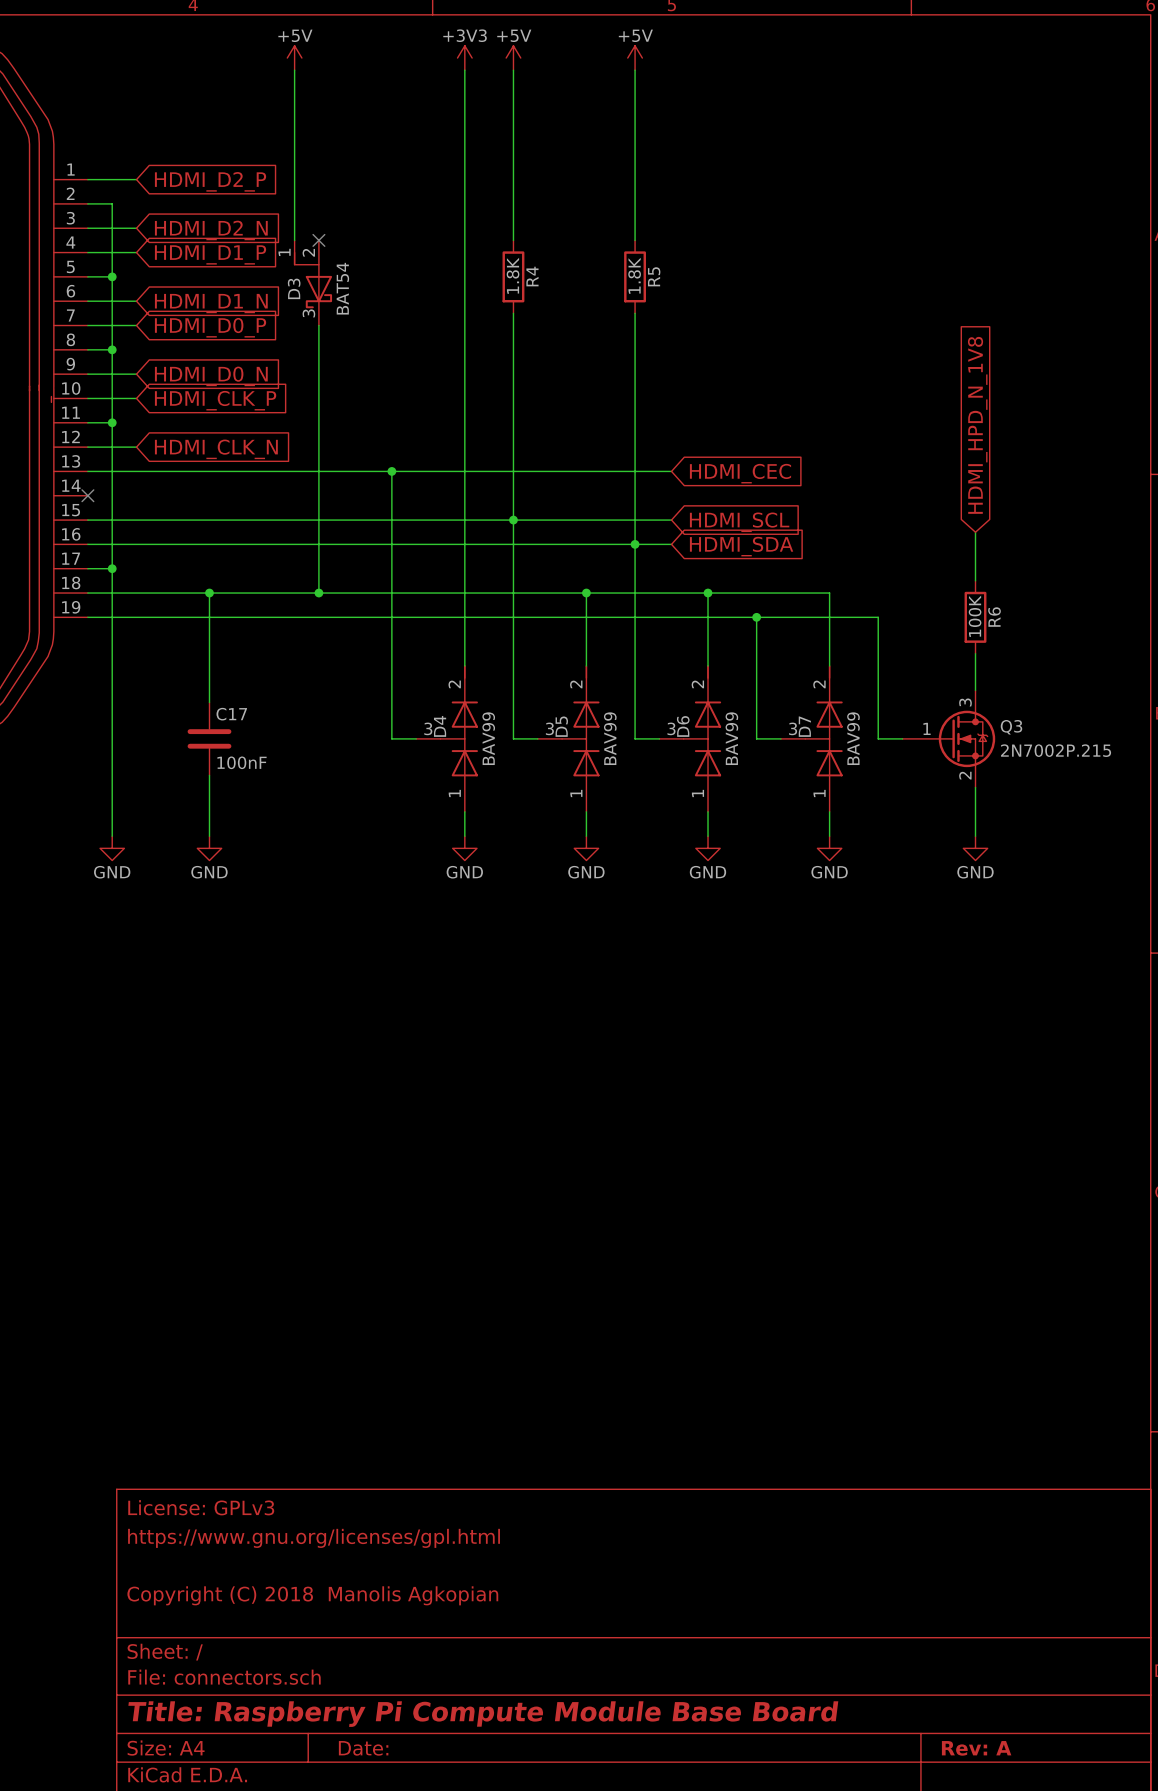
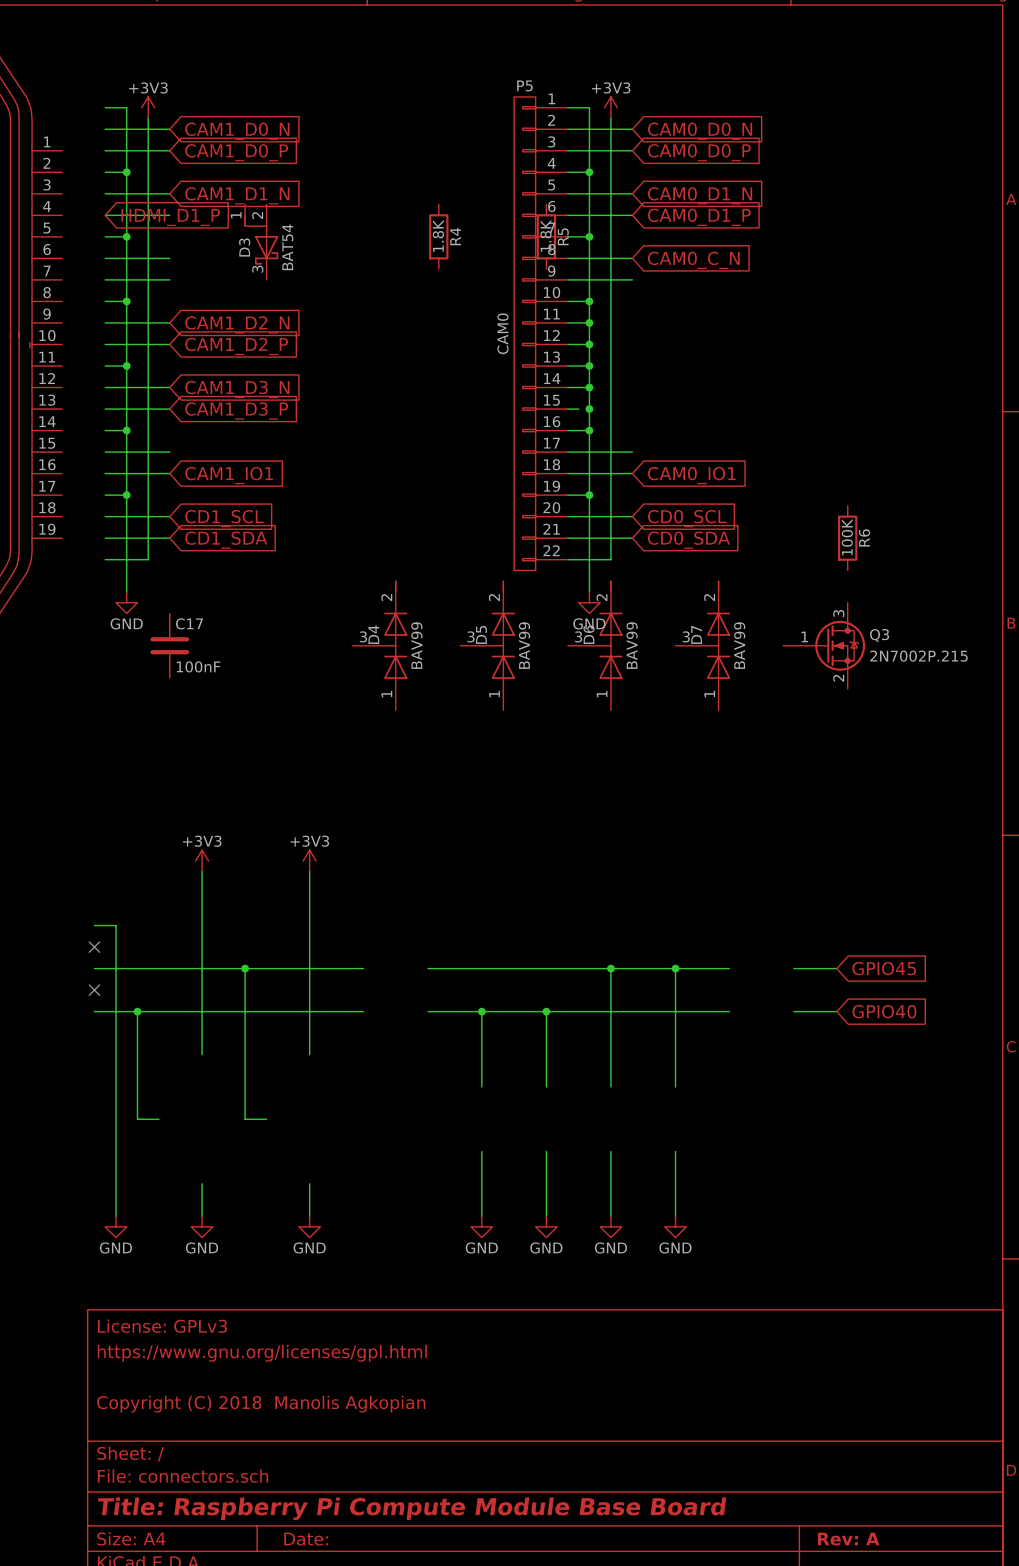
power symbol: +5V (294, 58) -> none
power symbol: +3V3 (464, 58) -> none
power symbol: +5V (513, 58) -> none
power symbol: +5V (635, 58) -> none
wire: (294, 70) (294, 240) -> none
wire: (464, 70) (464, 665) -> none
wire: (513, 70) (513, 240) -> none
wire: (635, 70) (635, 240) -> none
wire: none -> (105, 107) (126, 107) (126, 591)
power symbol: none -> +3V3 (148, 107)
wire: none -> (567, 107) (589, 107) (589, 591)
power symbol: none -> +3V3 (610, 107)
wire: none -> (148, 118) (148, 559) (105, 559)
wire: none -> (610, 118) (610, 516)
wire: none -> (105, 129) (169, 129)
wire: none -> (567, 129) (632, 129)
global label: none -> CAM1_D0_N (237, 131)
global label: none -> CAM0_D0_N (700, 131)
wire: (87, 179) (136, 179) -> (169, 150) (105, 150)
wire: none -> (567, 150) (632, 150)
global label: HDMI_D2_P (210, 181) -> none
global label: none -> CAM1_D0_P (236, 152)
global label: none -> CAM0_D0_P (699, 152)
wire: (87, 203) (112, 203) (112, 836) -> none
wire: none -> (105, 172) (126, 172)
junction: none -> (126, 172)
wire: none -> (567, 172) (589, 172)
junction: none -> (589, 172)
wire: (87, 228) (136, 228) -> (169, 193) (105, 193)
wire: none -> (567, 193) (632, 193)
global label: HDMI_D2_N (211, 230) -> none
global label: none -> CAM1_D1_N (237, 195)
global label: none -> CAM0_D1_N (700, 195)
no-connect mark: (318, 240) -> none
wire: (87, 252) (136, 252) -> (169, 215) (105, 215)
wire: none -> (567, 215) (632, 215)
global label: none -> CAM0_D1_P (699, 217)
wire: (87, 276) (112, 276) -> (105, 236) (126, 236)
junction: (112, 276) -> none
junction: none -> (126, 236)
wire: none -> (567, 236) (589, 236)
junction: none -> (589, 236)
wire: (87, 301) (136, 301) -> (169, 258) (105, 258)
wire: none -> (567, 258) (632, 258)
global label: HDMI_D1_N (211, 303) -> none
global label: none -> CAM0_C_N (693, 260)
wire: (513, 313) (513, 738) (537, 738) -> none
wire: (635, 313) (635, 738) (659, 738) -> none
wire: (87, 325) (136, 325) -> (169, 279) (105, 279)
wire: (318, 325) (318, 593) -> none
wire: none -> (567, 279) (632, 279)
global label: HDMI_D0_P (210, 327) -> none
wire: (87, 349) (112, 349) -> (105, 301) (126, 301)
junction: (112, 349) -> none
junction: none -> (126, 301)
wire: none -> (567, 301) (589, 301)
junction: none -> (589, 301)
wire: (87, 374) (136, 374) -> (169, 322) (105, 322)
wire: none -> (567, 322) (589, 322)
junction: none -> (589, 322)
global label: HDMI_D0_N (211, 376) -> none
global label: none -> CAM1_D2_N (237, 324)
P5: none -> CAM0 (541, 333)
wire: (87, 398) (136, 398) -> (169, 344) (105, 344)
wire: none -> (567, 344) (589, 344)
junction: none -> (589, 344)
global label: HDMI_CLK_P (215, 400) -> none
global label: none -> CAM1_D2_P (236, 346)
wire: (87, 422) (112, 422) -> (105, 366) (126, 366)
junction: (112, 422) -> none
junction: none -> (126, 366)
wire: none -> (567, 366) (589, 366)
junction: none -> (589, 366)
global label: HDMI_HPD_N_1V8 (977, 425) -> none
wire: (87, 447) (136, 447) -> (169, 387) (105, 387)
wire: none -> (567, 387) (589, 387)
junction: none -> (589, 387)
global label: HDMI_CLK_N (216, 449) -> none
global label: none -> CAM1_D3_N (237, 389)
wire: (87, 471) (136, 471) -> none
wire: (209, 471) (659, 471) -> none
wire: (391, 471) (391, 738) (416, 738) -> none
junction: (391, 471) -> none
junction: none -> (589, 409)
global label: none -> CAM1_D3_P (236, 411)
global label: HDMI_CEC (740, 473) -> none
no-connect mark: (87, 495) -> none
wire: none -> (105, 430) (126, 430)
junction: none -> (126, 430)
wire: none -> (567, 430) (589, 430)
junction: none -> (589, 430)
wire: (87, 520) (136, 520) -> none
wire: (209, 520) (659, 520) -> none
junction: (513, 520) -> none
wire: none -> (578, 452) (632, 452)
global label: HDMI_SCL (739, 522) -> none
wire: (975, 532) (975, 580) -> none
wire: (87, 544) (136, 544) -> none
wire: (209, 544) (659, 544) -> none
junction: (635, 544) -> none
wire: none -> (578, 473) (632, 473)
global label: none -> CAM1_IO1 (229, 475)
global label: HDMI_SDA (741, 546) -> none
global label: none -> CAM0_IO1 (691, 475)
wire: (87, 568) (112, 568) -> (105, 495) (126, 495)
junction: (112, 568) -> none
junction: none -> (126, 495)
wire: none -> (567, 495) (589, 495)
junction: none -> (589, 495)
wire: (87, 593) (136, 593) -> none
junction: (209, 593) -> none
junction: (318, 593) -> none
wire: (586, 593) (586, 665) -> none
junction: (586, 593) -> none
wire: (659, 593) (209, 593) (209, 702) -> none
junction: (708, 593) -> none
wire: (732, 593) (829, 593) (829, 665) -> none
global label: none -> CD1_SCL (224, 518)
global label: none -> CD0_SCL (687, 518)
wire: (87, 617) (136, 617) -> none
wire: (209, 617) (659, 617) -> none
wire: (732, 617) (878, 617) (878, 738) (902, 738) -> none
wire: (756, 617) (756, 738) (780, 738) -> none
junction: (756, 617) -> none
global label: none -> CD1_SDA (226, 540)
global label: none -> CD0_SDA (688, 540)
wire: (708, 641) (708, 665) -> (610, 559) (567, 559)
wire: (975, 653) (975, 690) -> none
power symbol: none -> GND (126, 602)
power symbol: none -> GND (589, 602)
wire: (209, 775) (209, 836) -> none
wire: (975, 787) (975, 836) -> none
wire: (464, 811) (464, 836) -> none
wire: (586, 811) (586, 836) -> none
wire: (708, 811) (708, 836) -> none
wire: (829, 811) (829, 836) -> none
power symbol: GND (112, 848) -> none
power symbol: GND (209, 848) -> none
power symbol: GND (464, 848) -> none
power symbol: GND (586, 848) -> none
power symbol: GND (708, 848) -> none
power symbol: GND (829, 848) -> none
power symbol: GND (975, 848) -> none
power symbol: none -> +3V3 (202, 860)
power symbol: none -> +3V3 (309, 860)
wire: none -> (202, 871) (202, 1054)
wire: none -> (309, 871) (309, 1054)
wire: none -> (94, 925) (115, 925) (115, 1216)
no-connect mark: none -> (94, 947)
wire: none -> (94, 968) (363, 968)
wire: none -> (245, 968) (245, 1119) (266, 1119)
junction: none -> (245, 968)
wire: none -> (428, 968) (729, 968)
wire: none -> (610, 968) (610, 1086)
junction: none -> (610, 968)
wire: none -> (675, 968) (675, 1086)
junction: none -> (675, 968)
wire: none -> (793, 968) (836, 968)
global label: none -> GPIO45 (884, 968)
no-connect mark: none -> (94, 990)
wire: none -> (94, 1011) (363, 1011)
wire: none -> (137, 1011) (137, 1119) (159, 1119)
junction: none -> (137, 1011)
wire: none -> (428, 1011) (729, 1011)
wire: none -> (481, 1011) (481, 1086)
junction: none -> (481, 1011)
wire: none -> (546, 1011) (546, 1086)
junction: none -> (546, 1011)
wire: none -> (793, 1011) (836, 1011)
global label: none -> GPIO40 (884, 1011)
wire: none -> (481, 1151) (481, 1216)
wire: none -> (546, 1151) (546, 1216)
wire: none -> (610, 1151) (610, 1216)
wire: none -> (675, 1151) (675, 1216)
wire: none -> (202, 1183) (202, 1216)
wire: none -> (309, 1183) (309, 1216)
power symbol: none -> GND (115, 1226)
power symbol: none -> GND (202, 1226)
power symbol: none -> GND (309, 1226)
power symbol: none -> GND (481, 1226)
power symbol: none -> GND (546, 1226)
power symbol: none -> GND (610, 1226)
power symbol: none -> GND (675, 1226)

